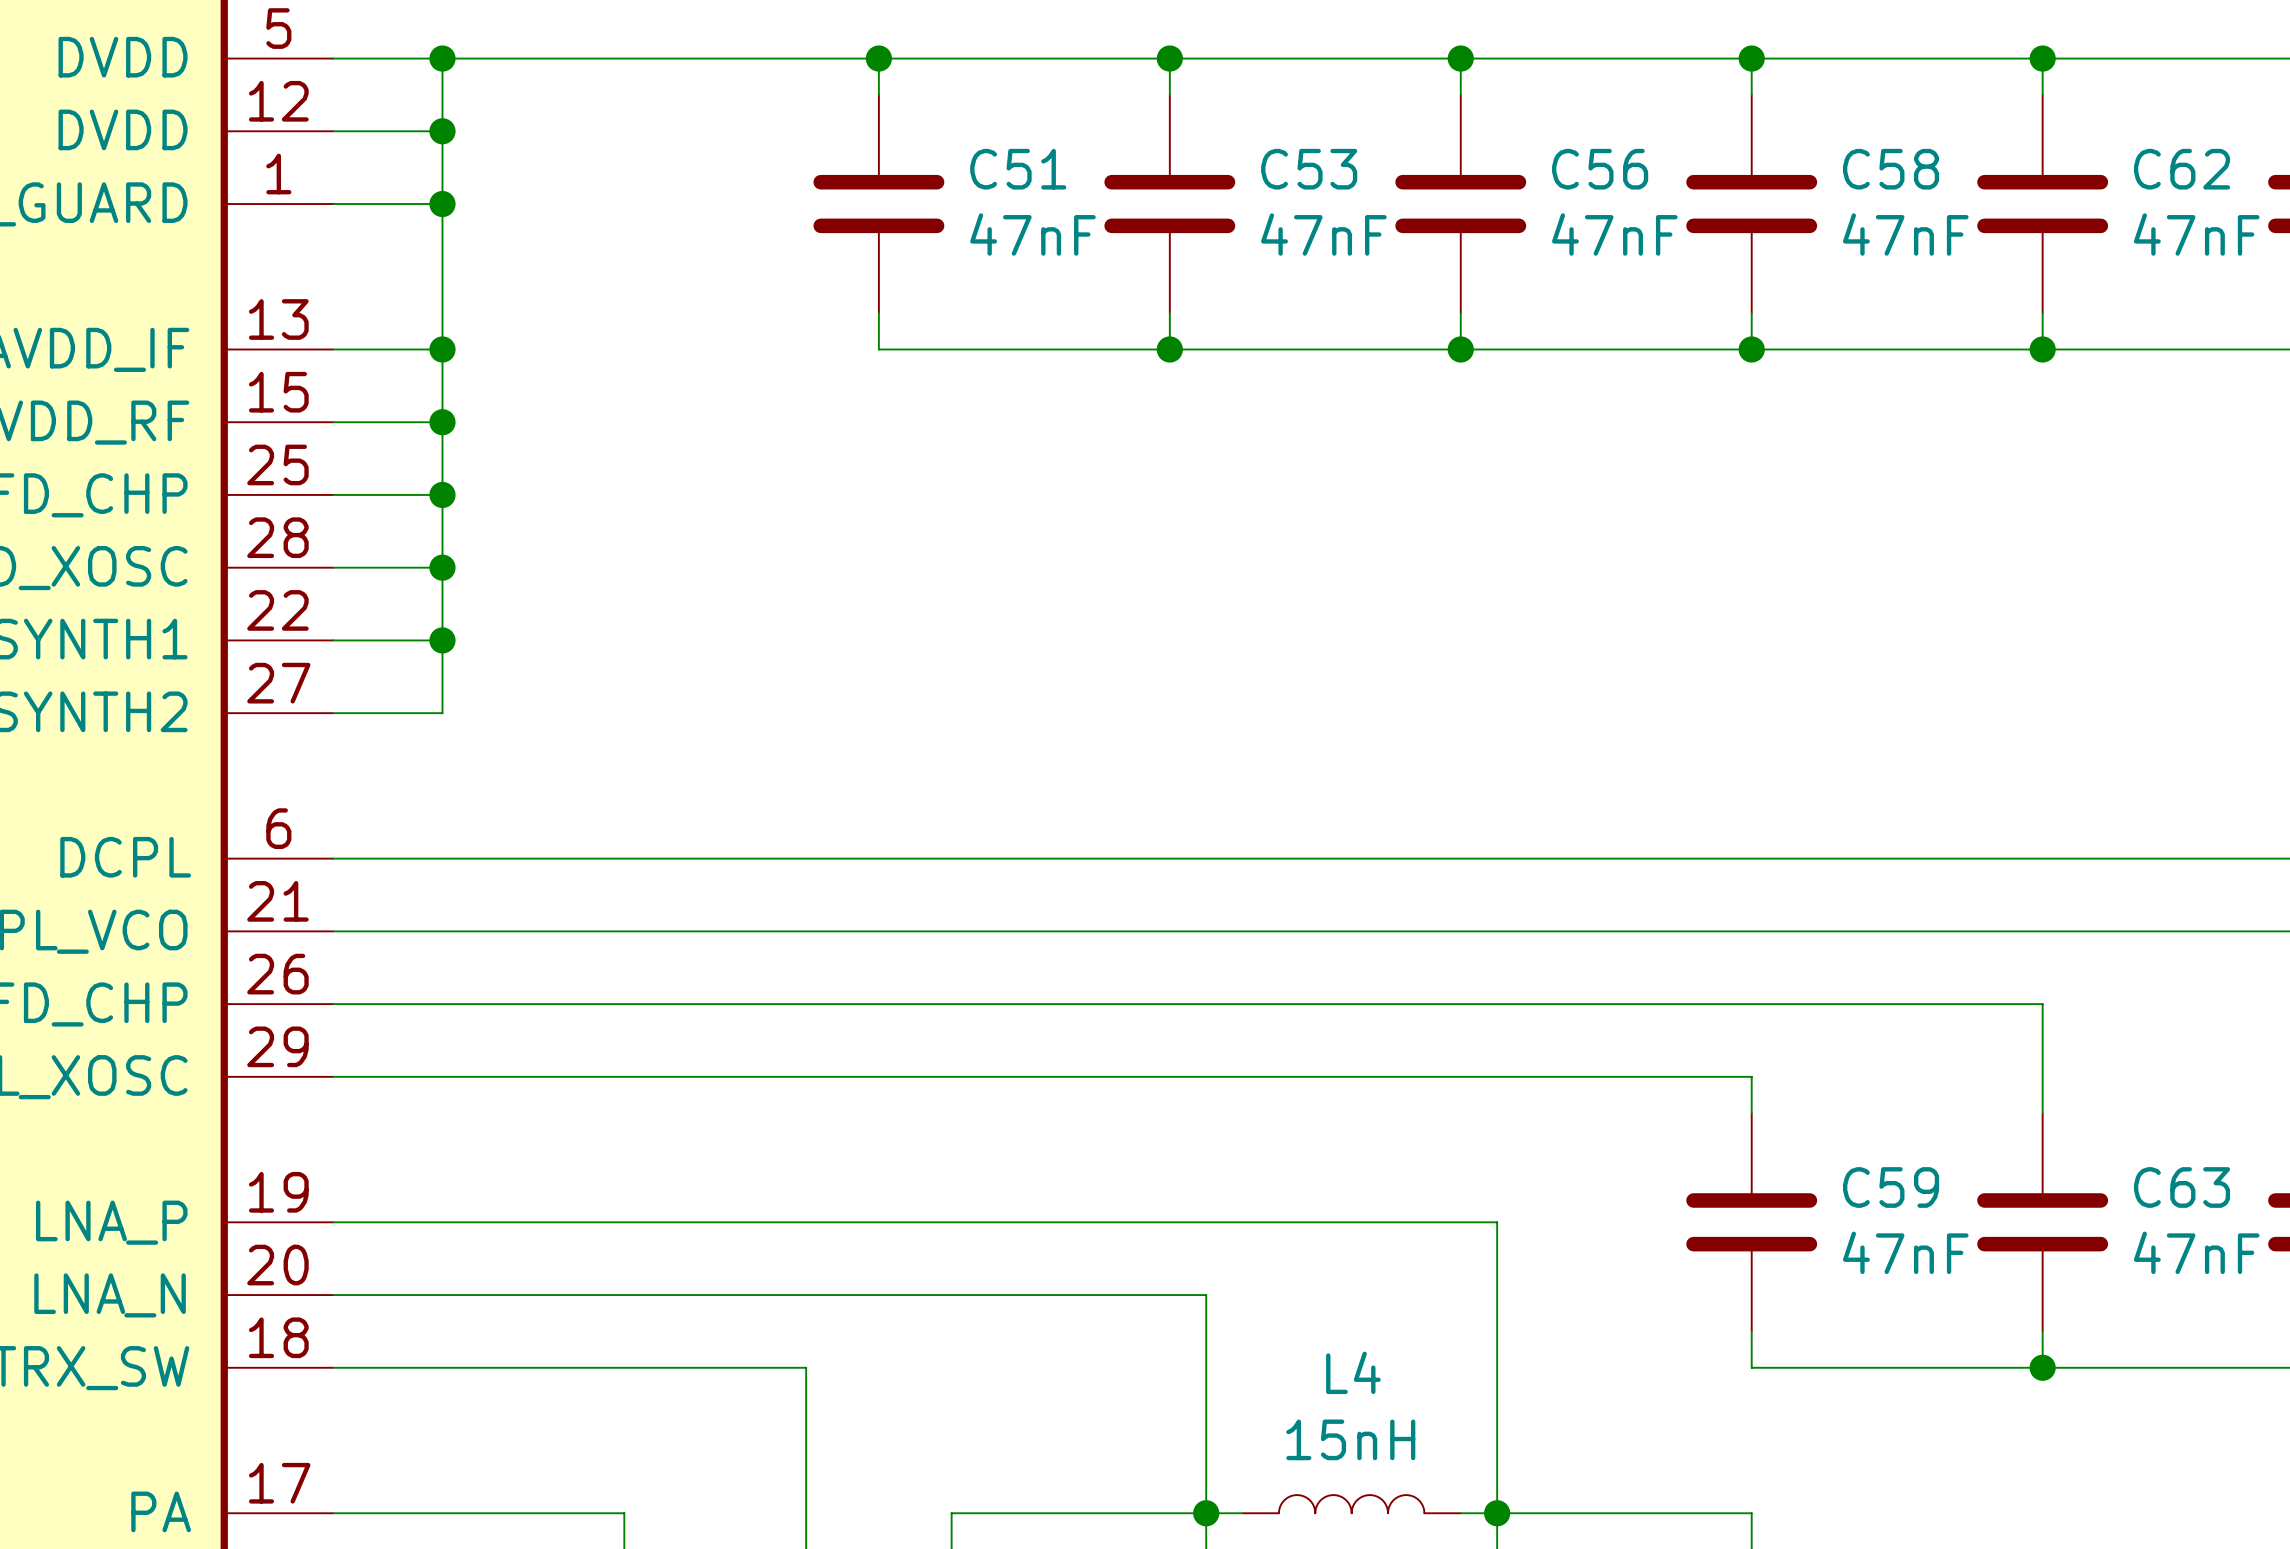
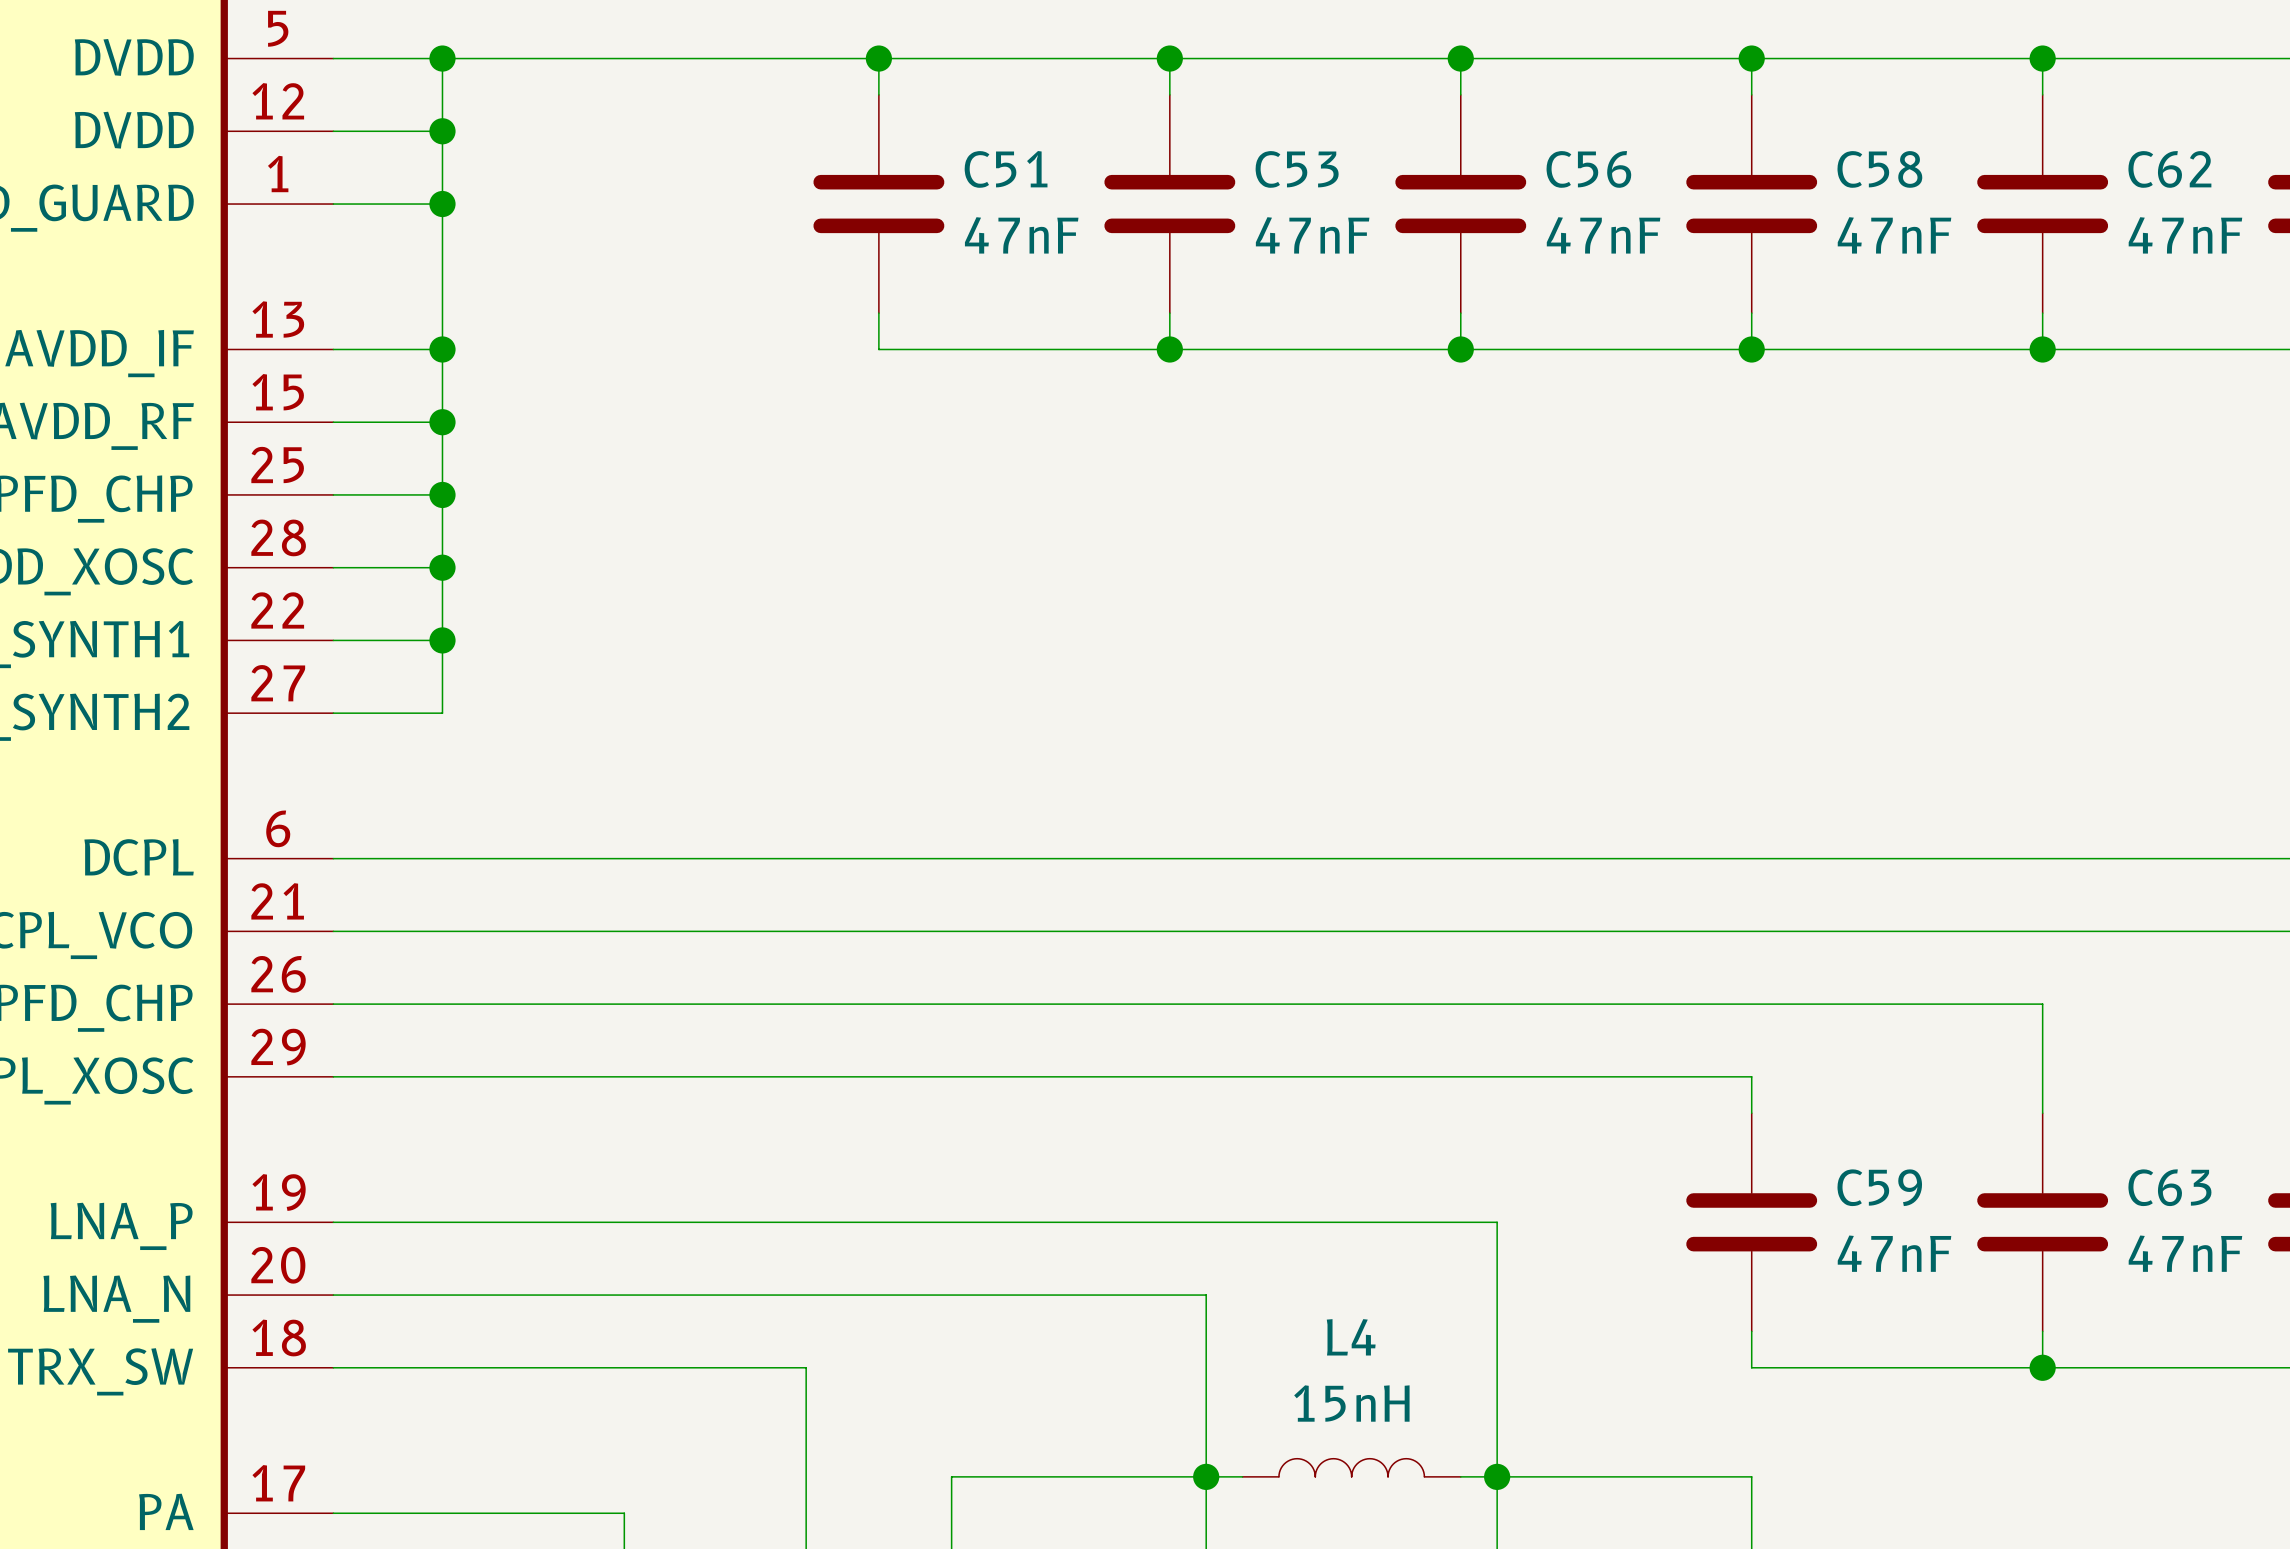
L4 position: (1351, 1504) -> (1351, 1467)
wire: (951, 1513) (1242, 1513) -> (951, 1513) (951, 1476) (1242, 1476)
junction position: (1206, 1513) -> (1206, 1476)
wire: (1460, 1513) (1751, 1513) -> (1460, 1476) (1751, 1476) (1751, 1513)
junction position: (1497, 1513) -> (1497, 1476)

